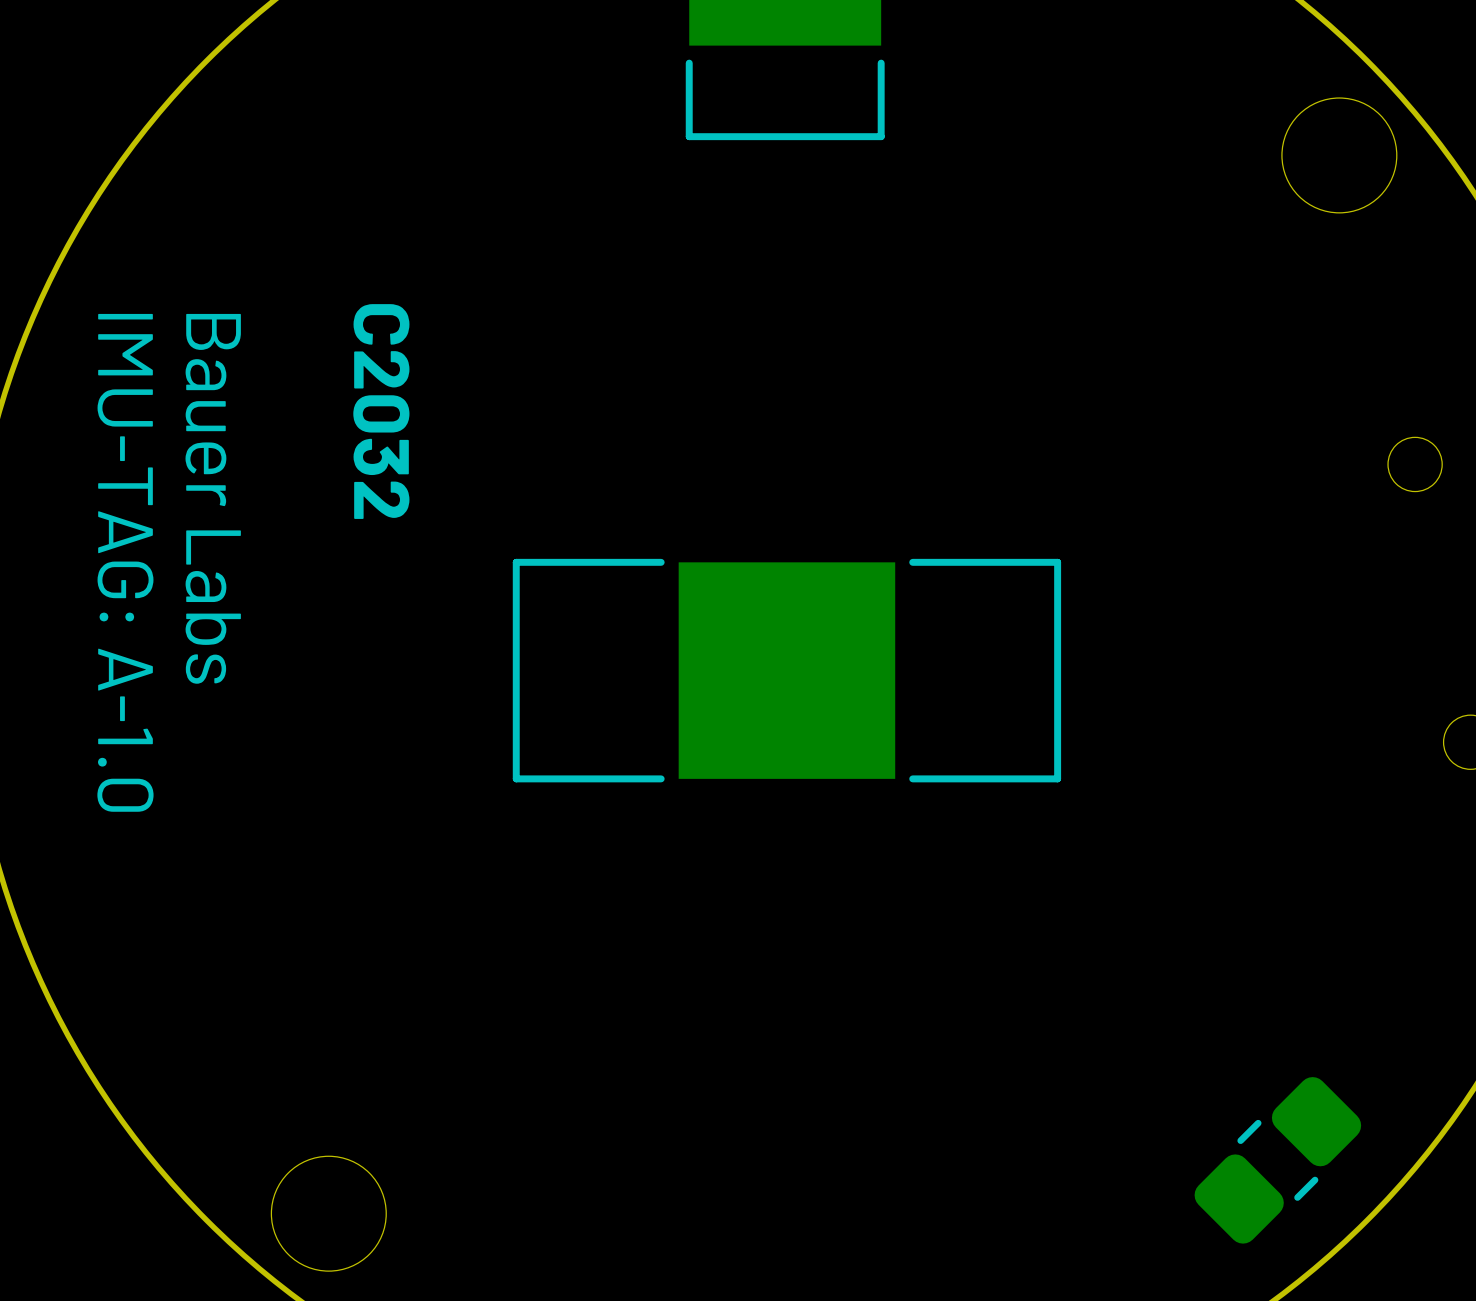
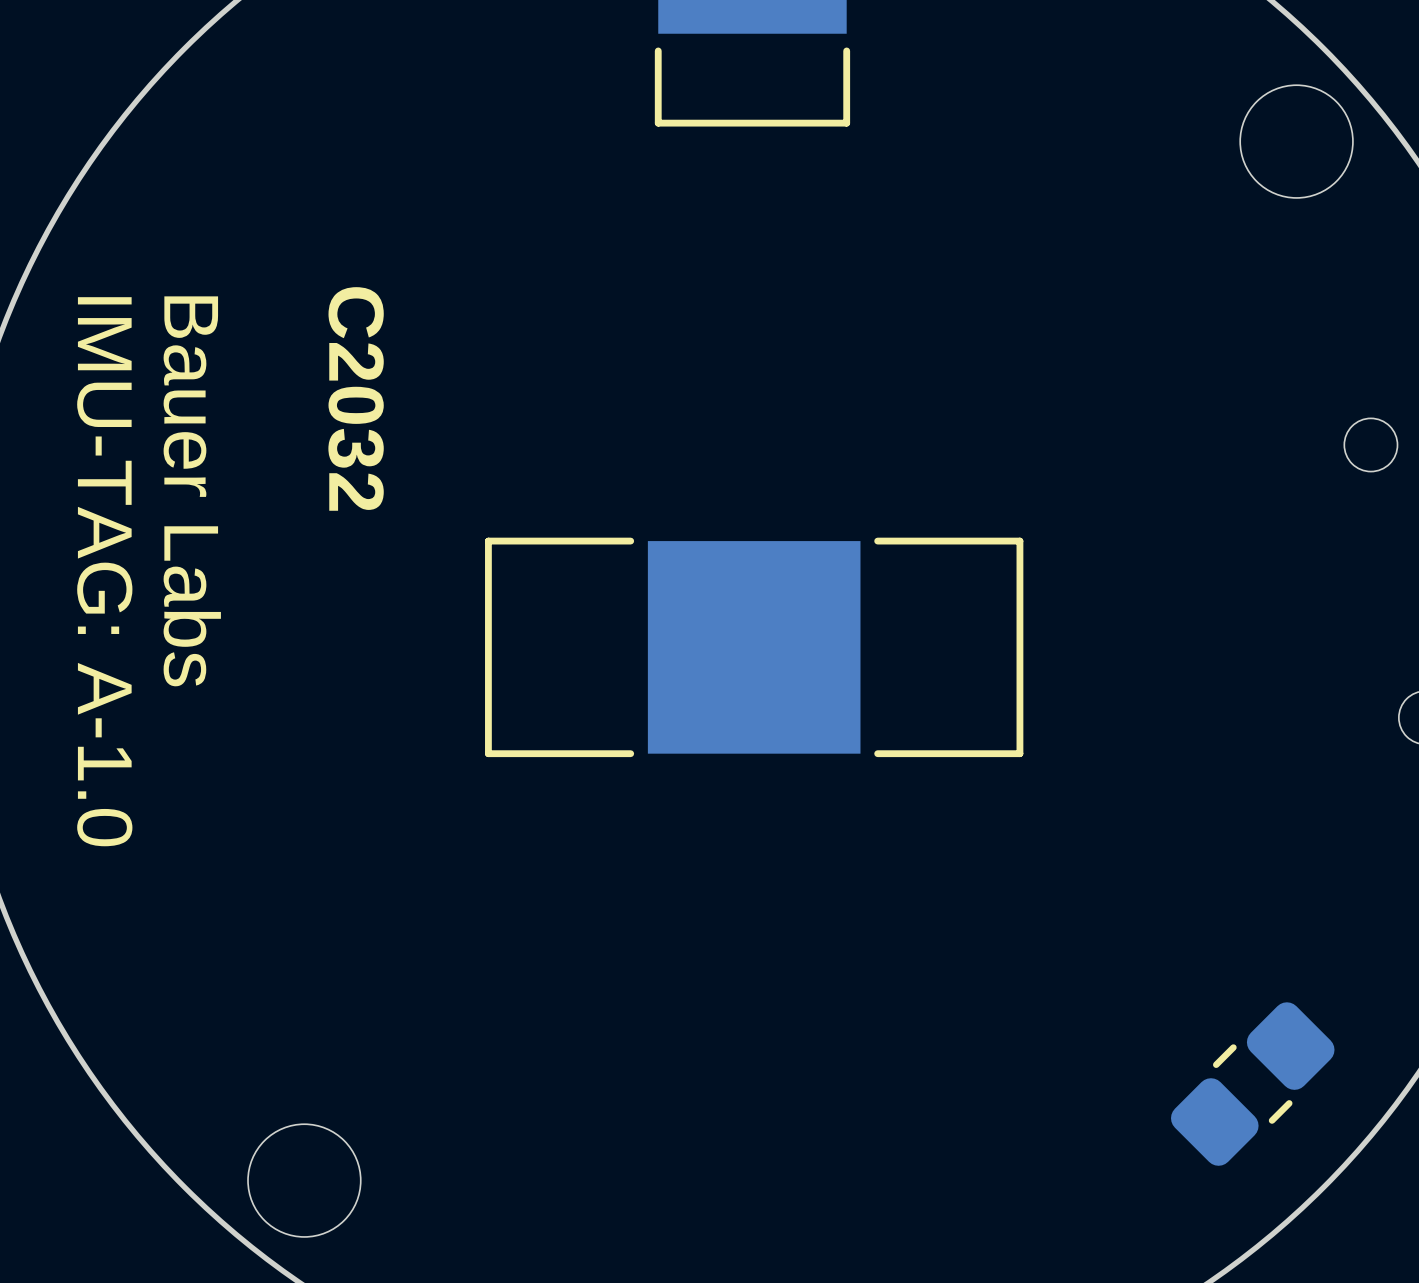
part position: (1277, 1160) -> (1252, 1084)

